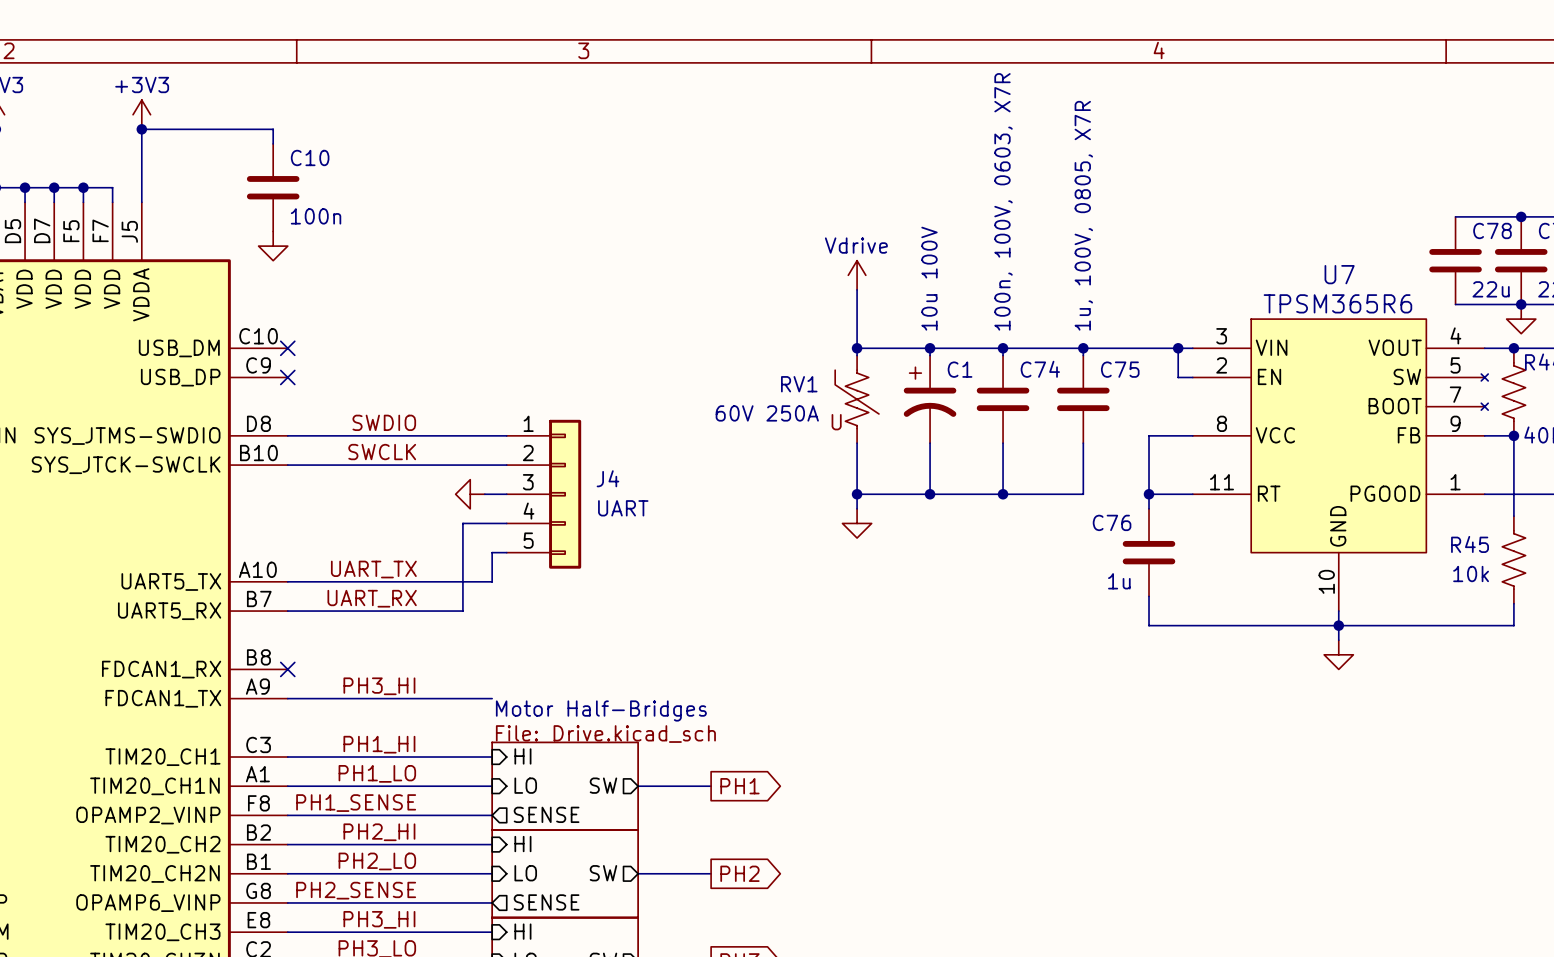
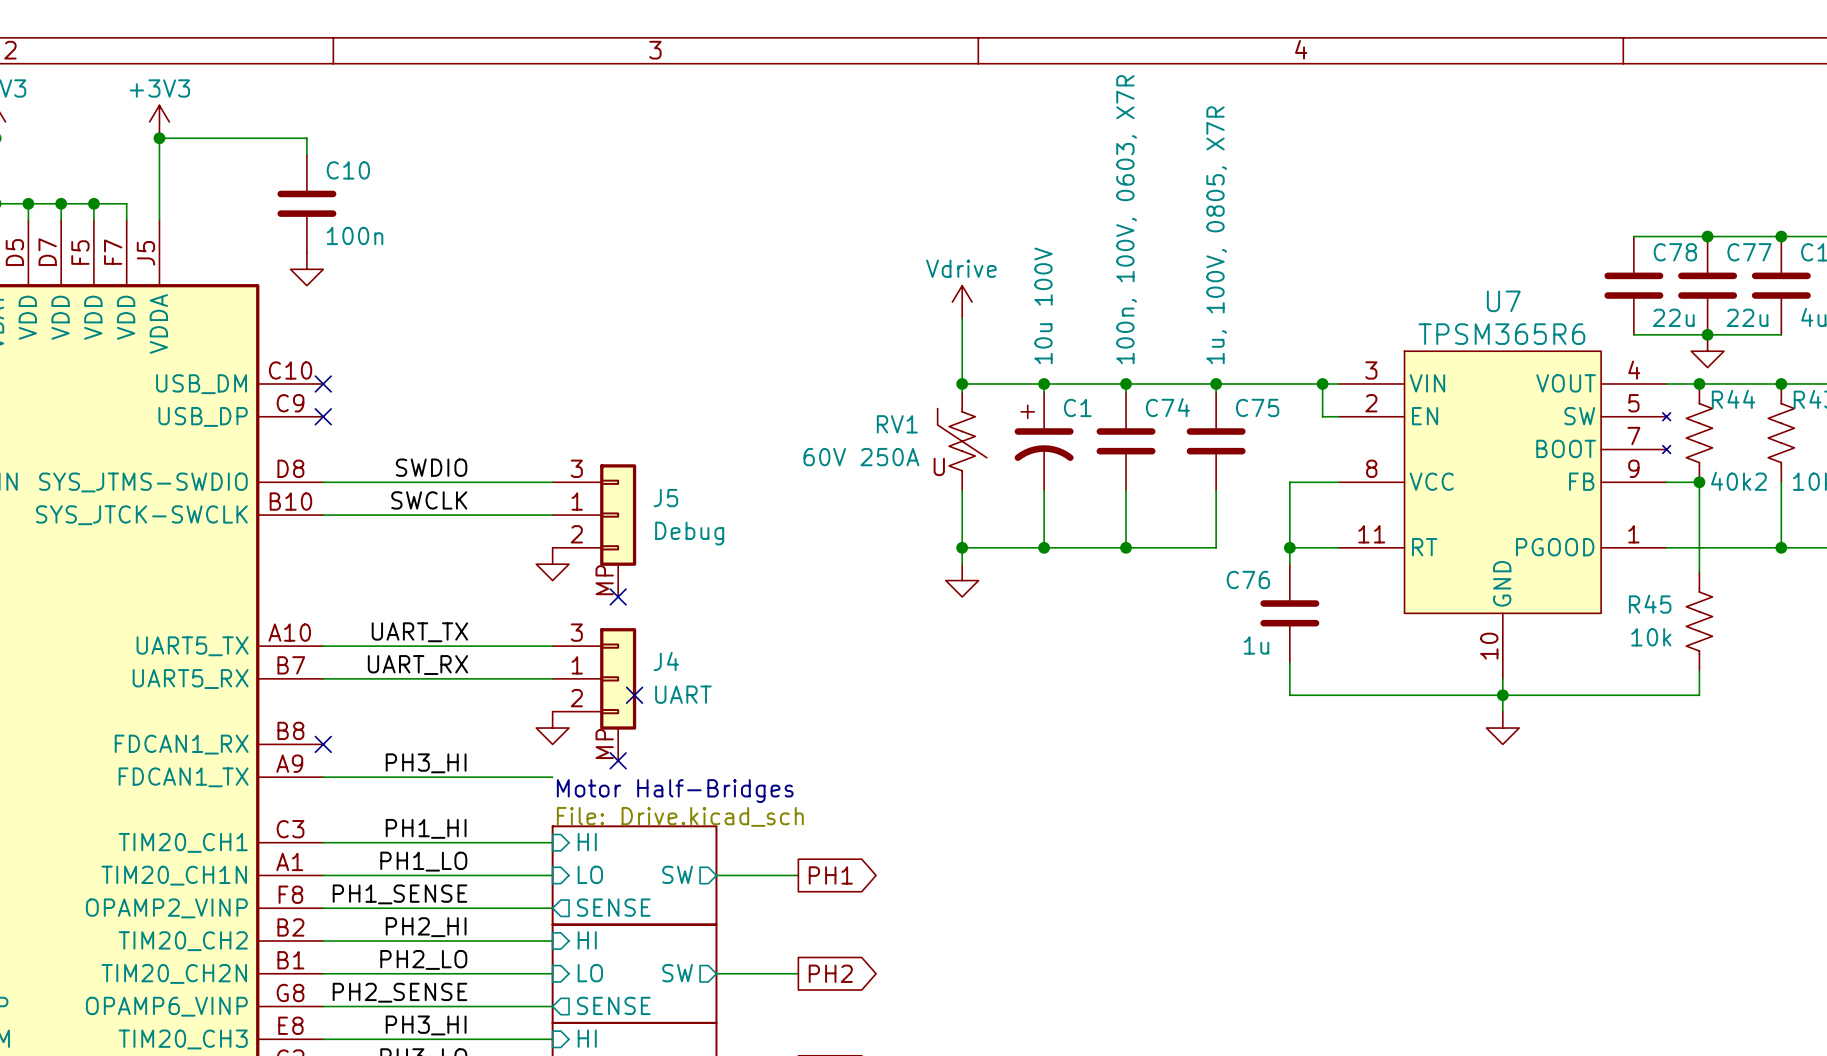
J4 symbol: [506, 419, 582, 569] -> [552, 628, 637, 761]
J5: none -> Debug (594, 530)
power symbol rotation: 0° (470, 494) -> 90° counterclockwise (552, 564)
power symbol position: (470, 494) -> (552, 564)
wire: (506, 523) (462, 523) (462, 611) -> (552, 678) (519, 678)
no-connect mark: none -> (618, 596)
wire: (506, 552) (492, 552) (492, 581) -> none
no-connect mark: none -> (634, 695)
power symbol: none -> (552, 728)
no-connect mark: none -> (618, 760)

